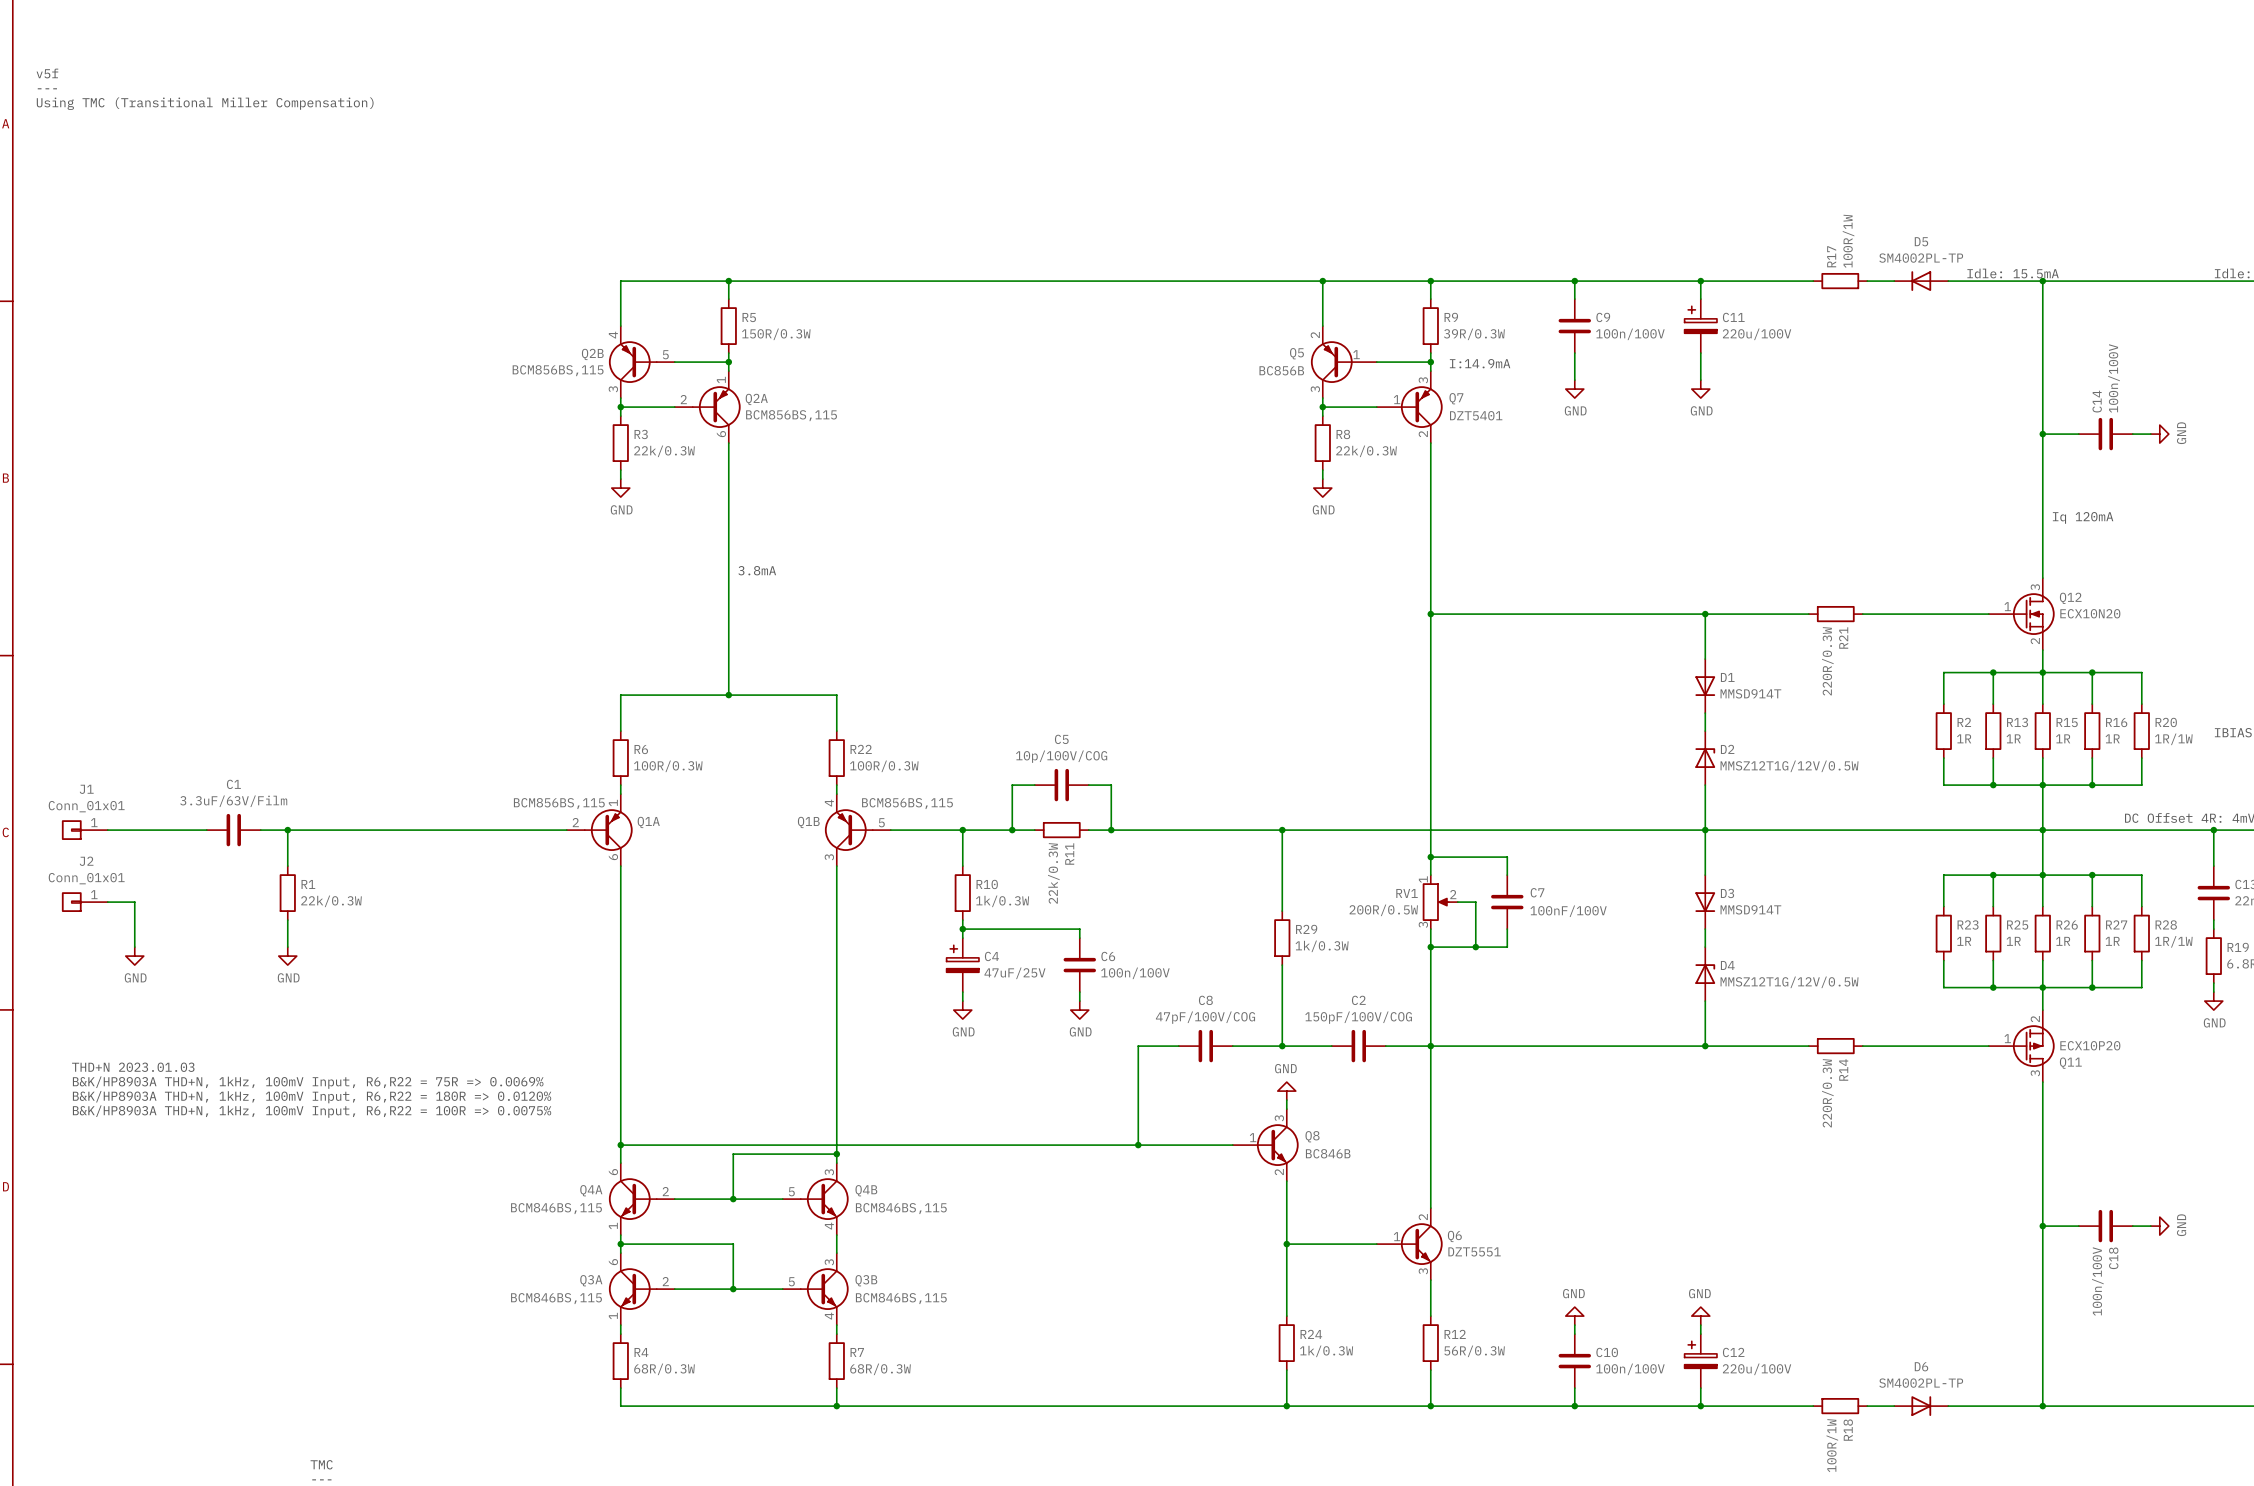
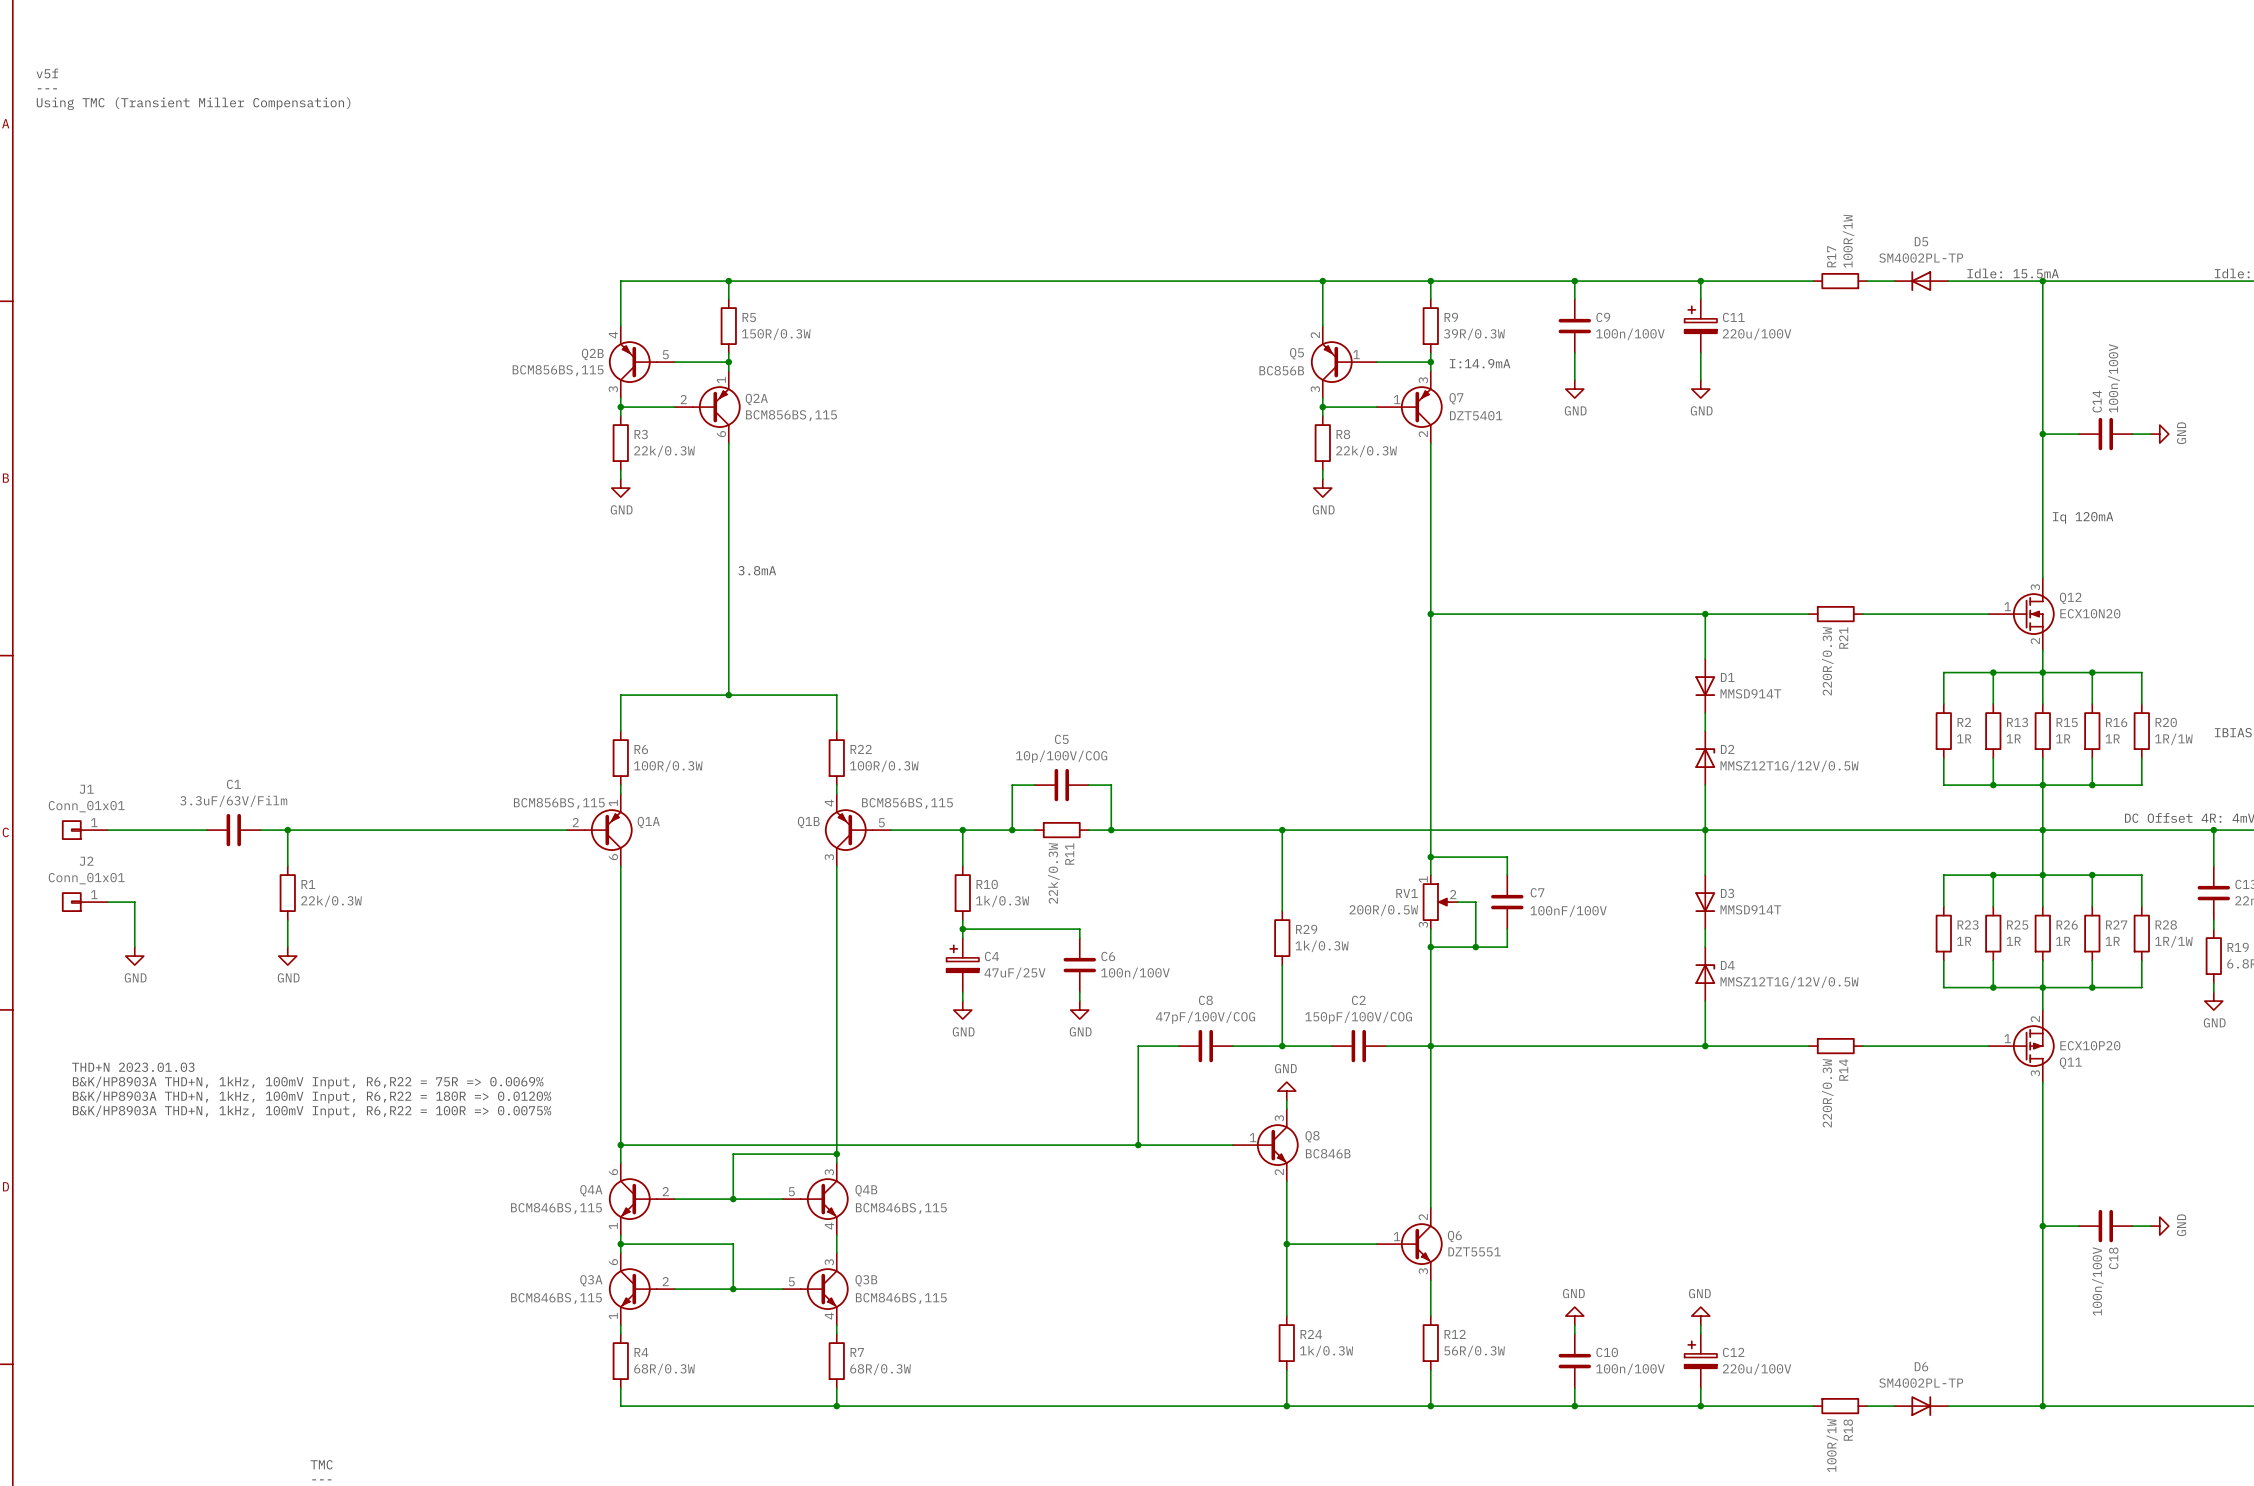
text: Using TMC (Transitional Miller Compensation) (205, 103) -> Using TMC (Transient Miller Compensation) (193, 103)

